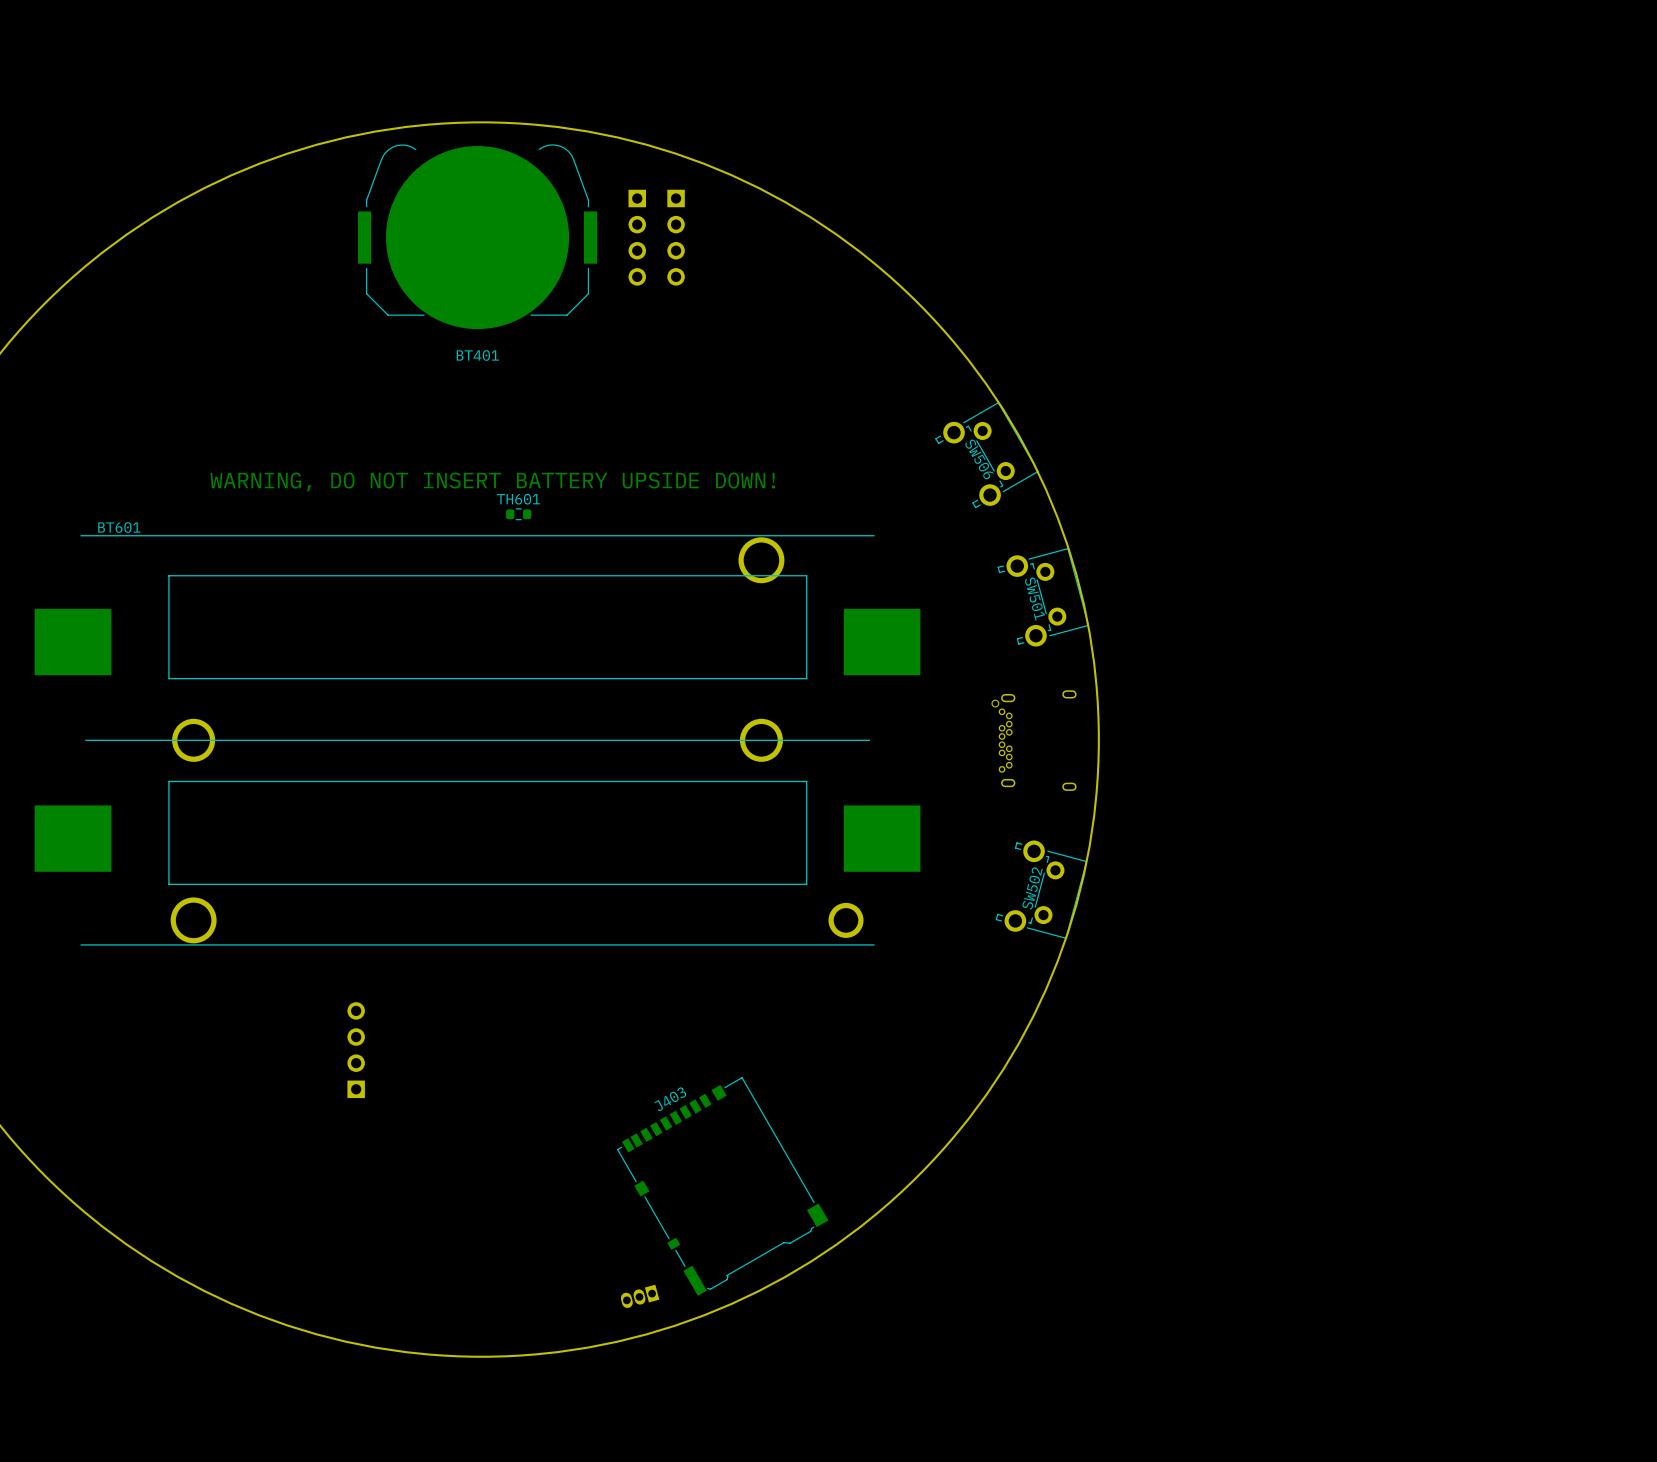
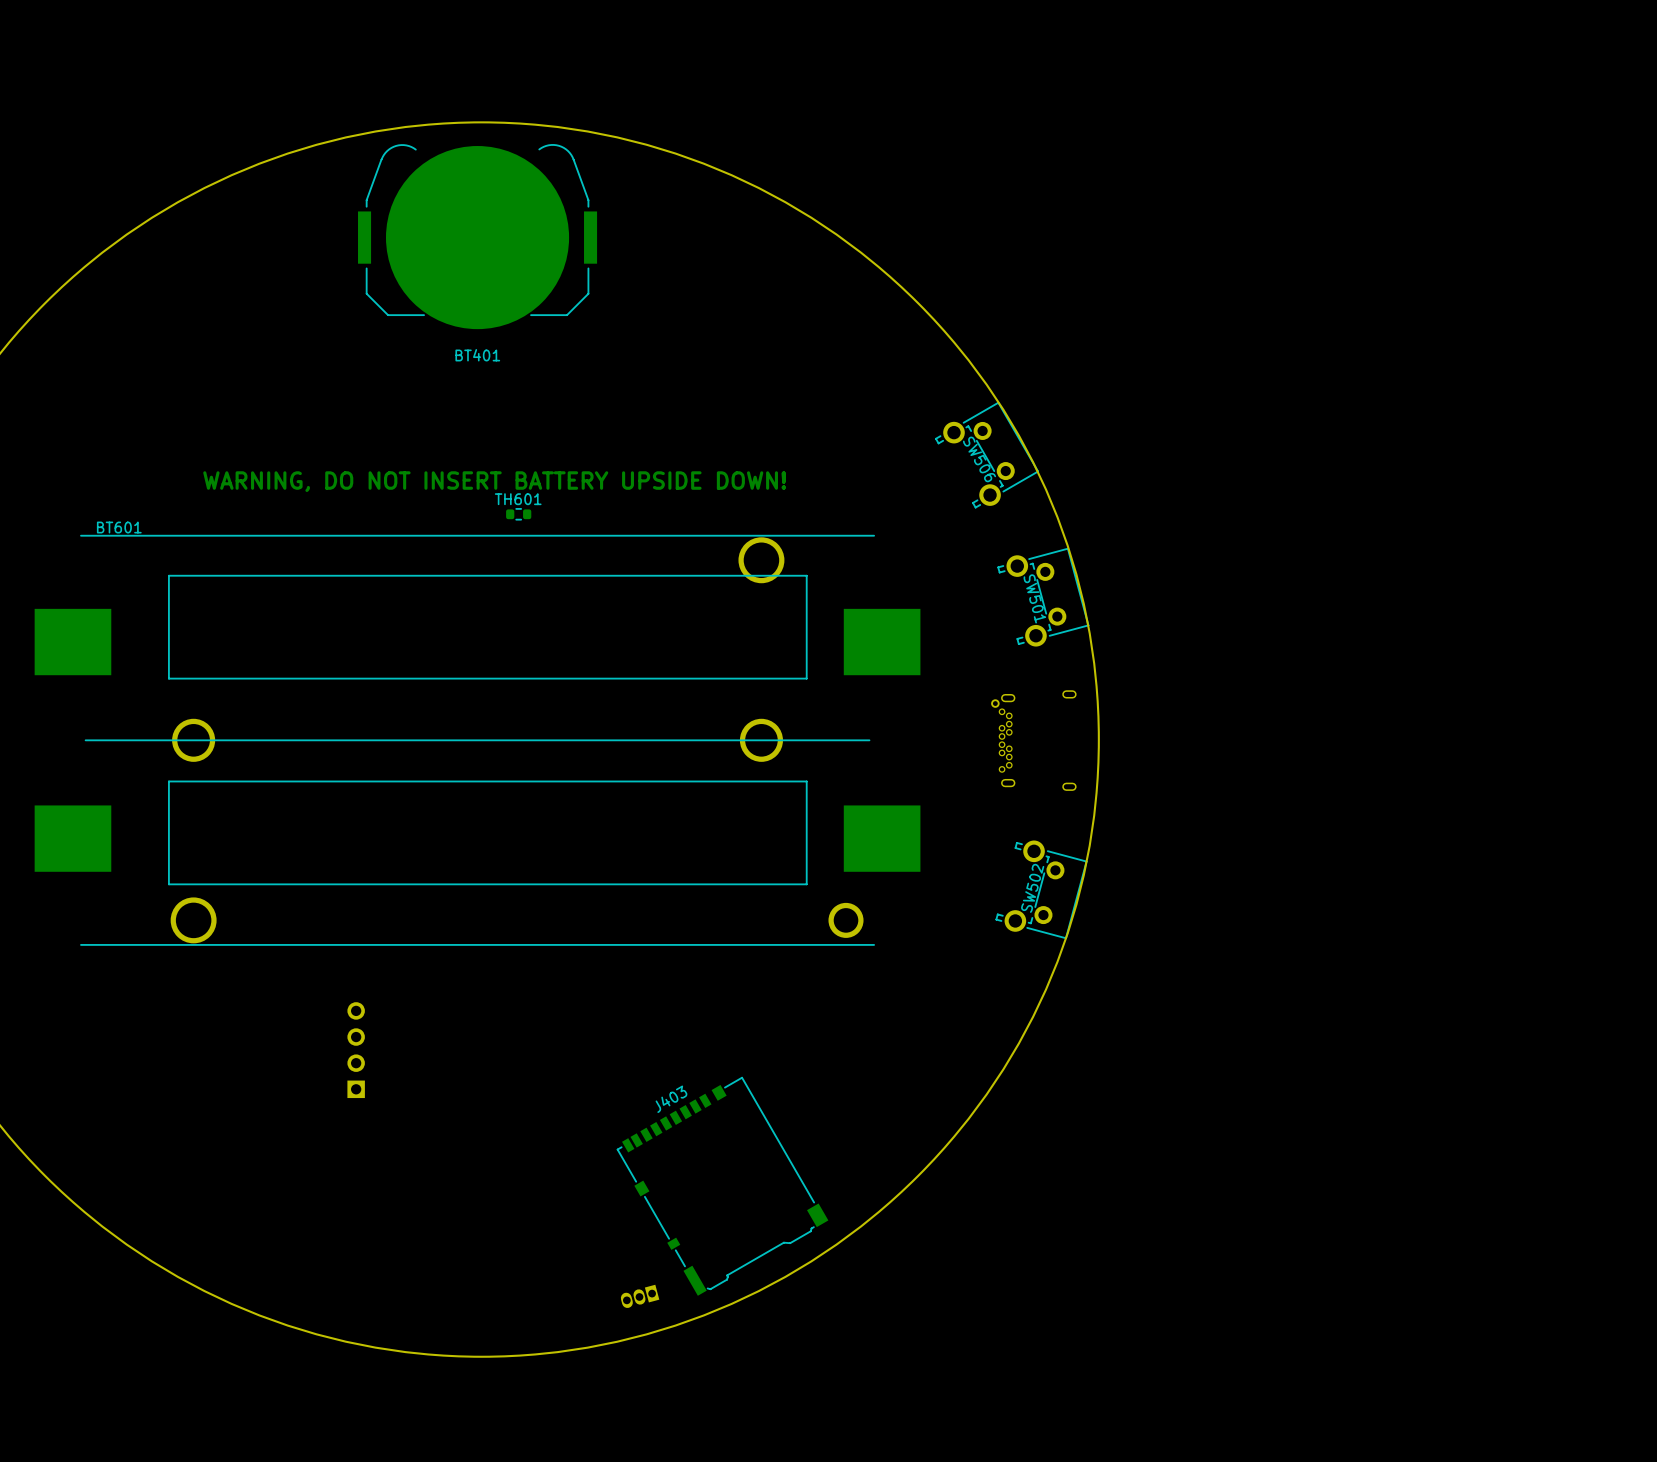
part: (637, 237) -> none
part: (676, 237) -> none

